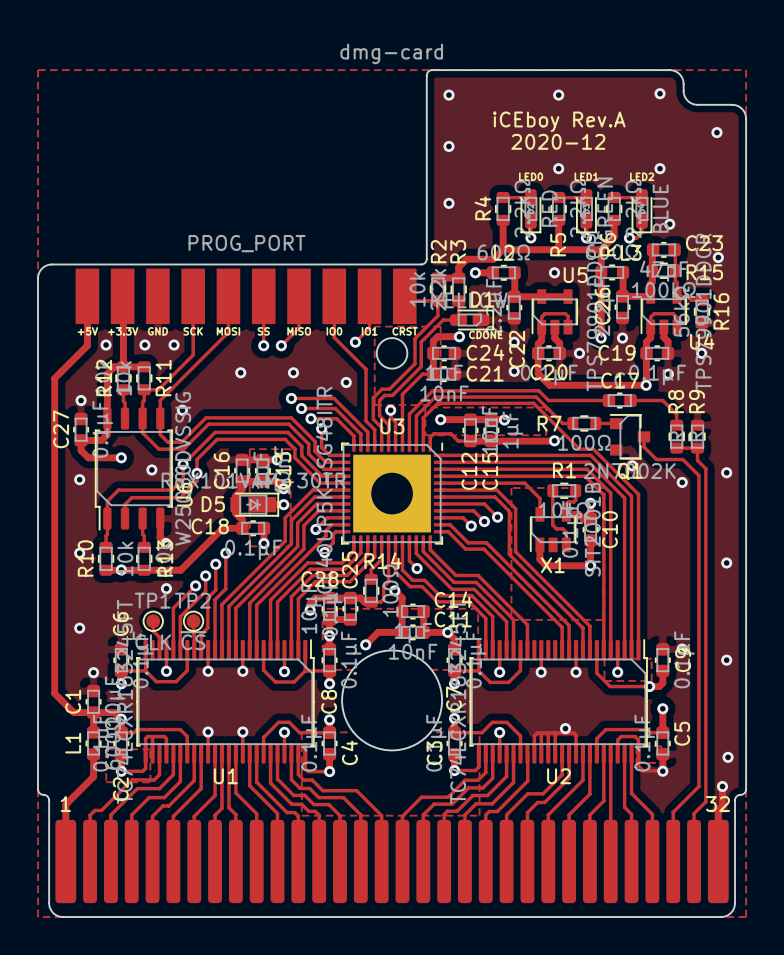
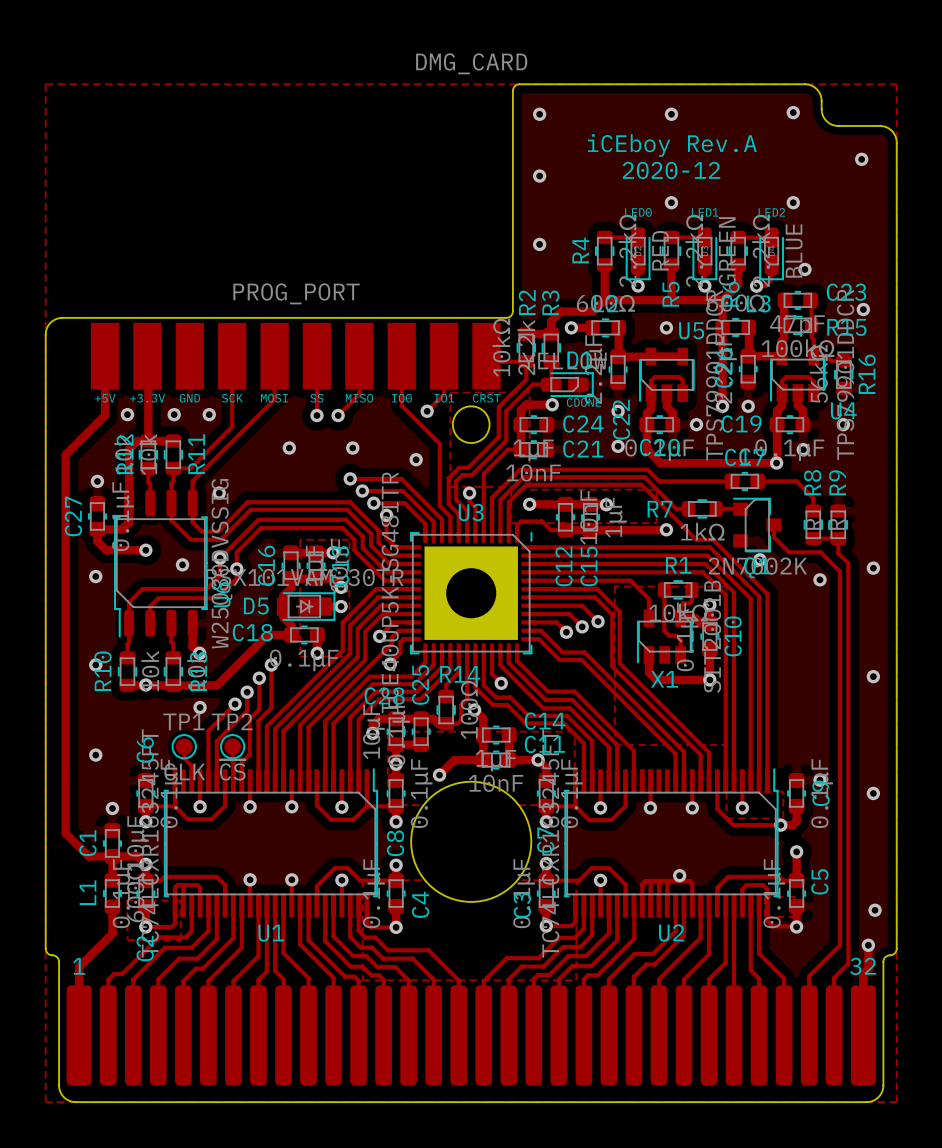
part value: dmg-card (391, 53) -> DMG_CARD (471, 63)
R2 value: 10k (417, 289) -> 10kΩ (501, 347)
R7 value: 100Ω (584, 442) -> 1kΩ (702, 531)

